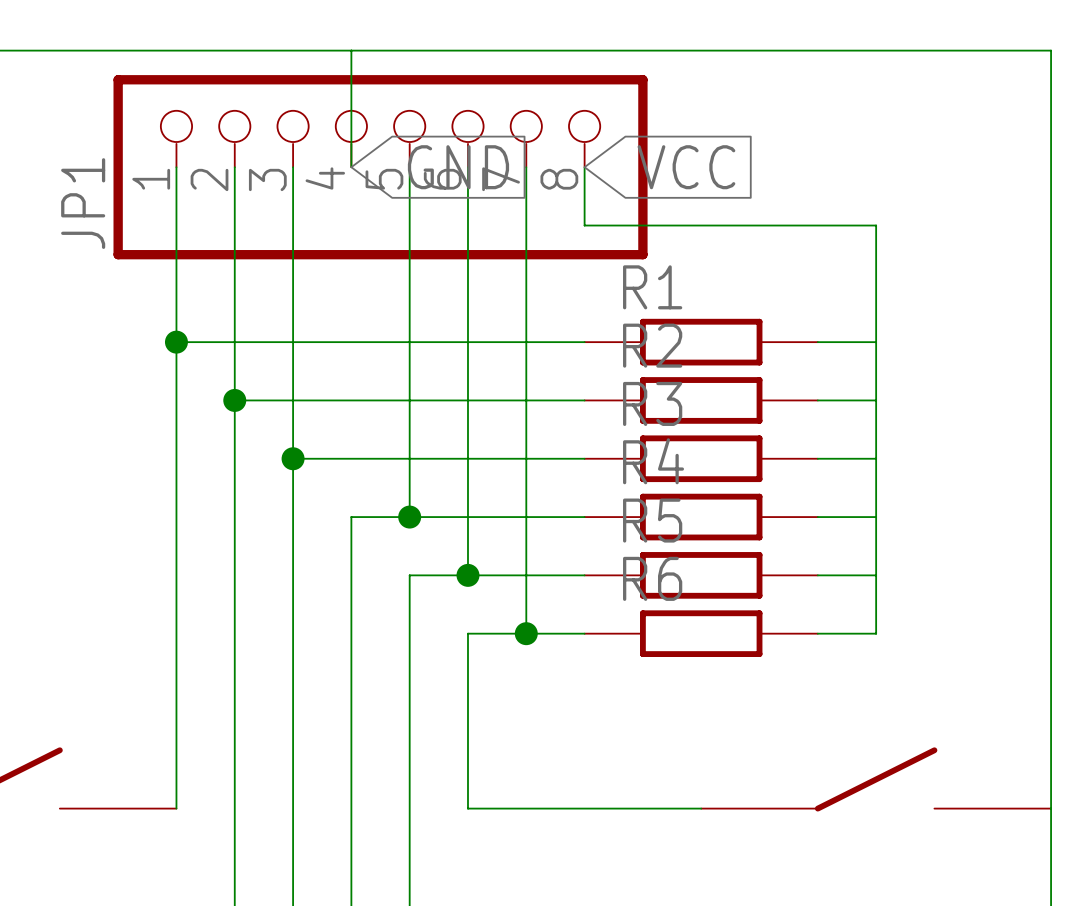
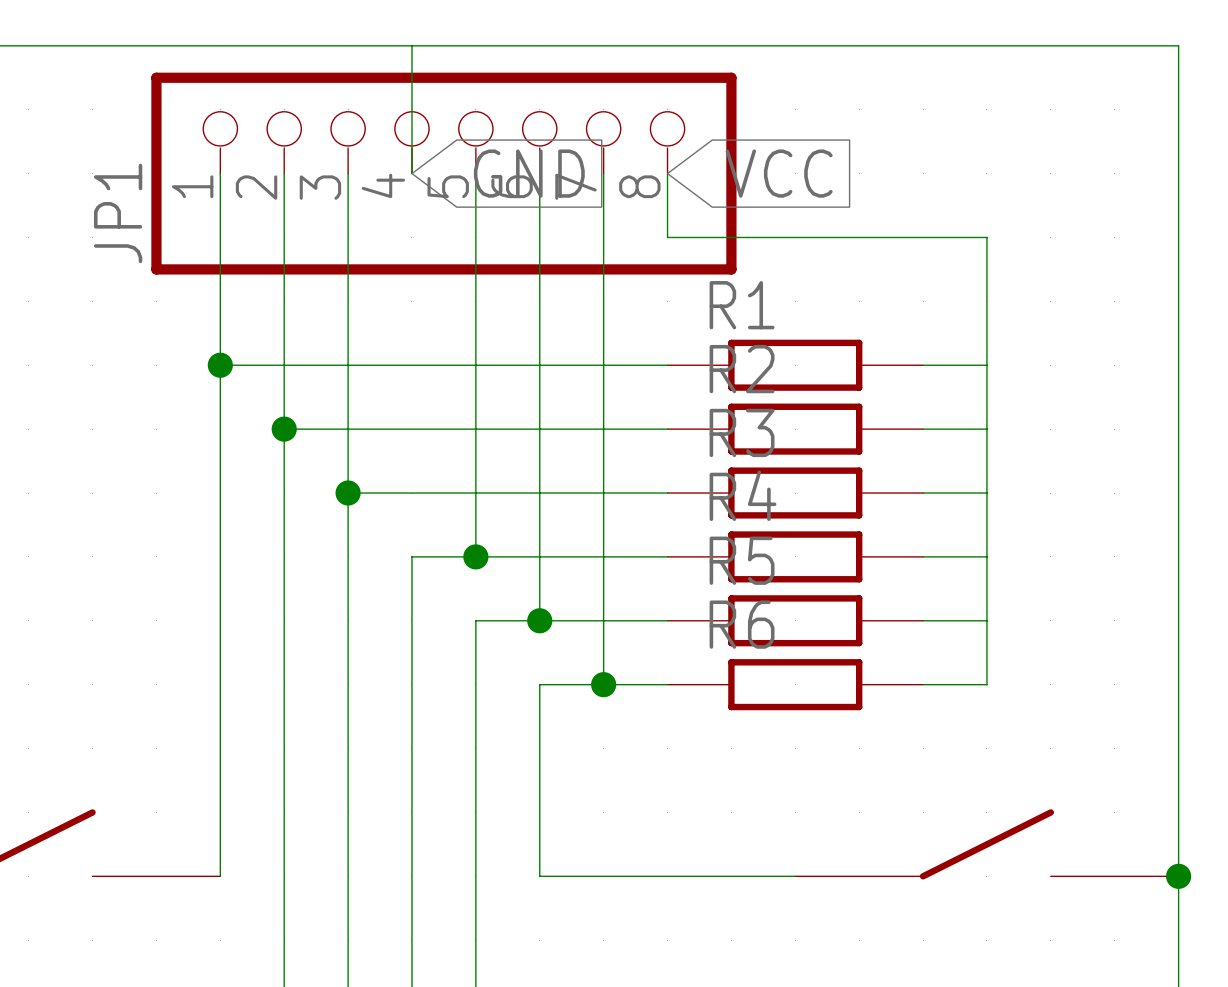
junction: none -> (1178, 876)

